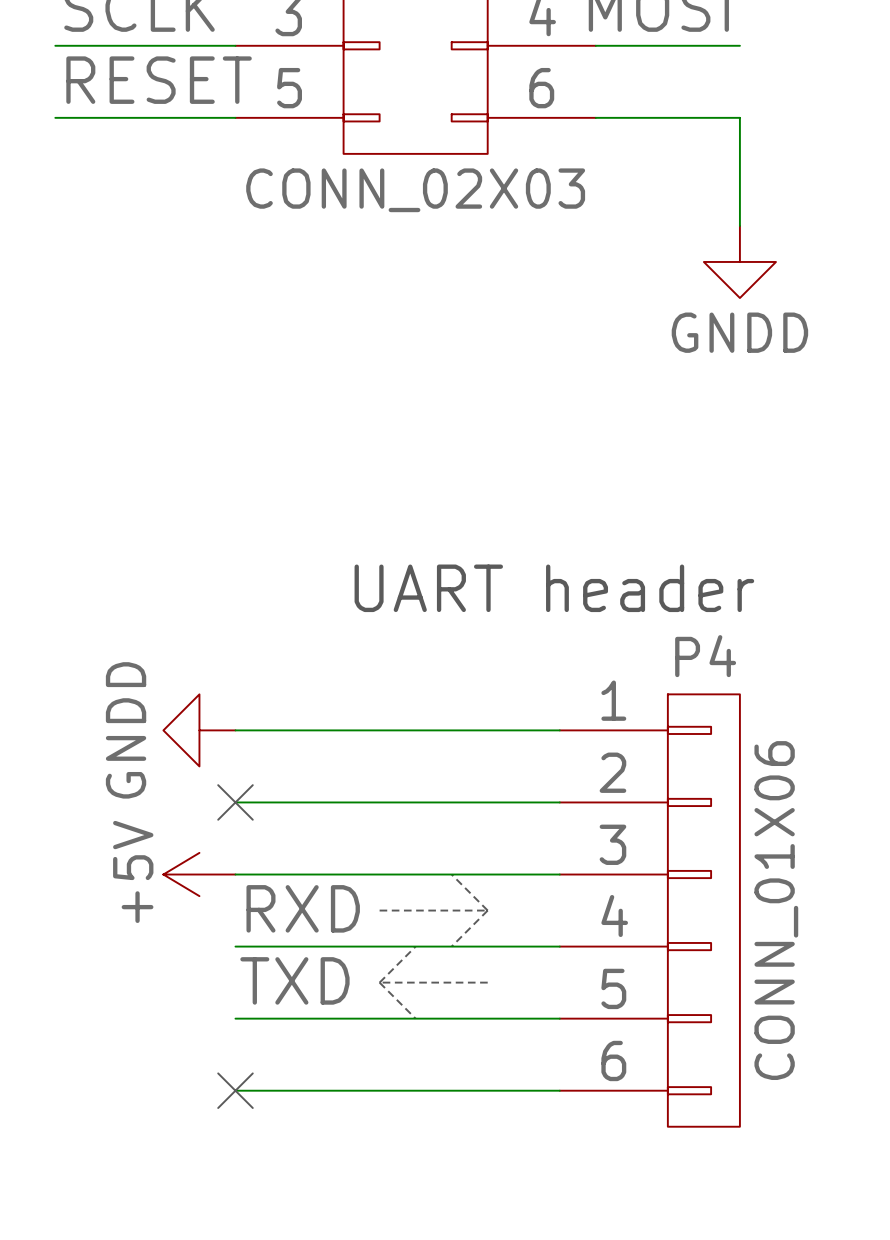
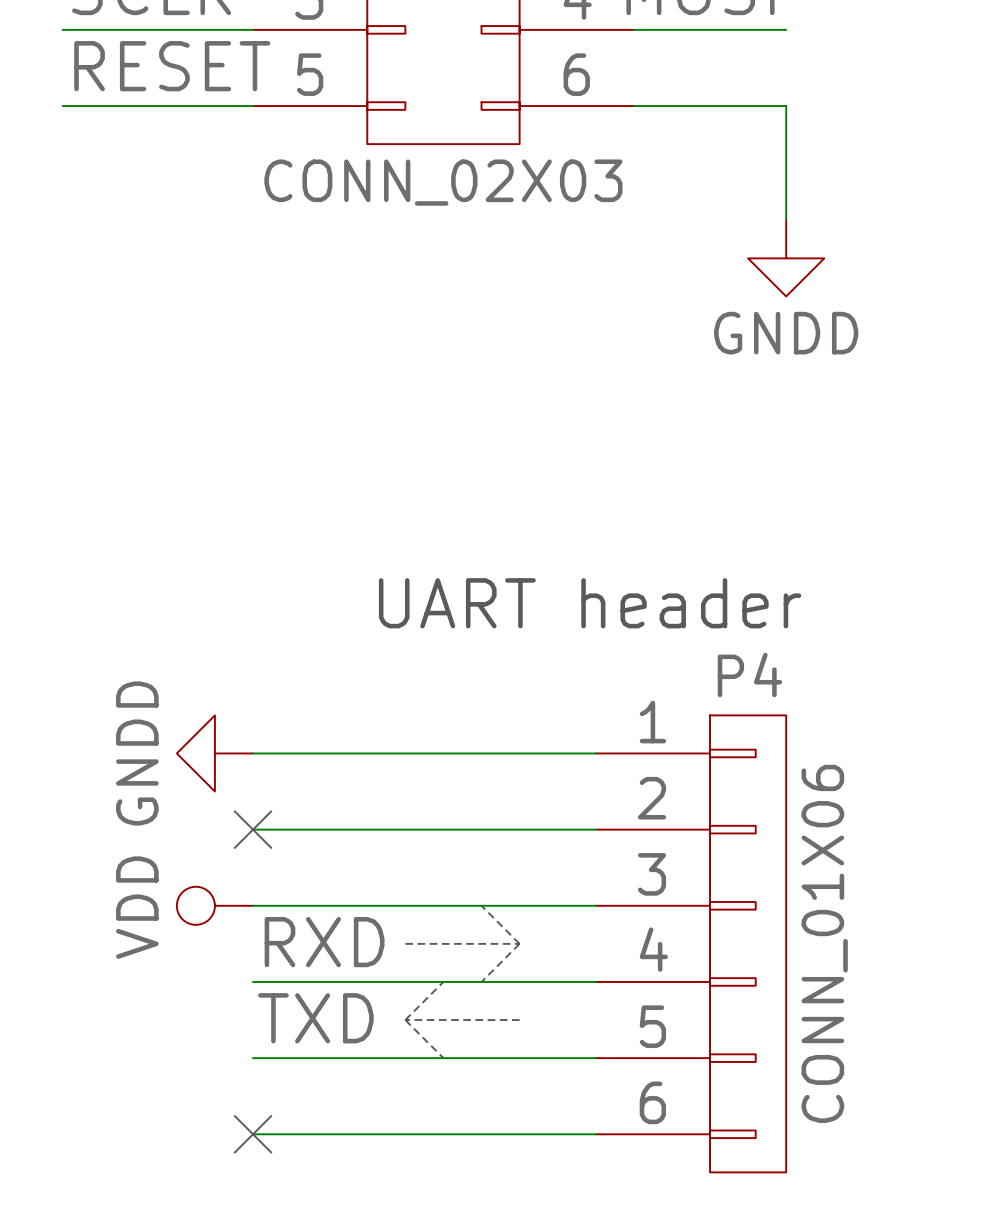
power symbol: +5V (199, 874) -> VDD (214, 905)

